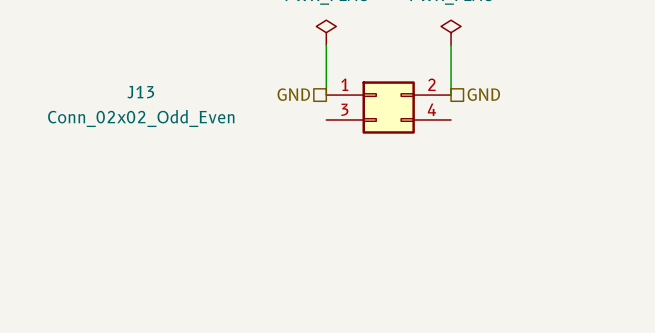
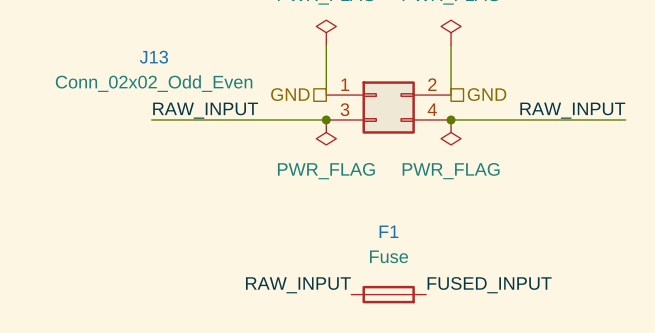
J13 name position: J13 (140, 92) -> J13 (153, 57)
label: none -> RAW_INPUT (205, 110)
label: none -> RAW_INPUT (572, 110)
J13 value position: Conn_02x02_Odd_Even (141, 118) -> Conn_02x02_Odd_Even (154, 83)
wire: none -> (151, 119) (326, 119)
junction: none -> (326, 119)
wire: none -> (451, 119) (625, 119)
junction: none -> (451, 119)
power symbol: none -> PWR_FLAG (326, 132)
power symbol: none -> PWR_FLAG (451, 132)
label: none -> RAW_INPUT (298, 285)
label: none -> FUSED_INPUT (489, 285)
F1: none -> Fuse (388, 294)

